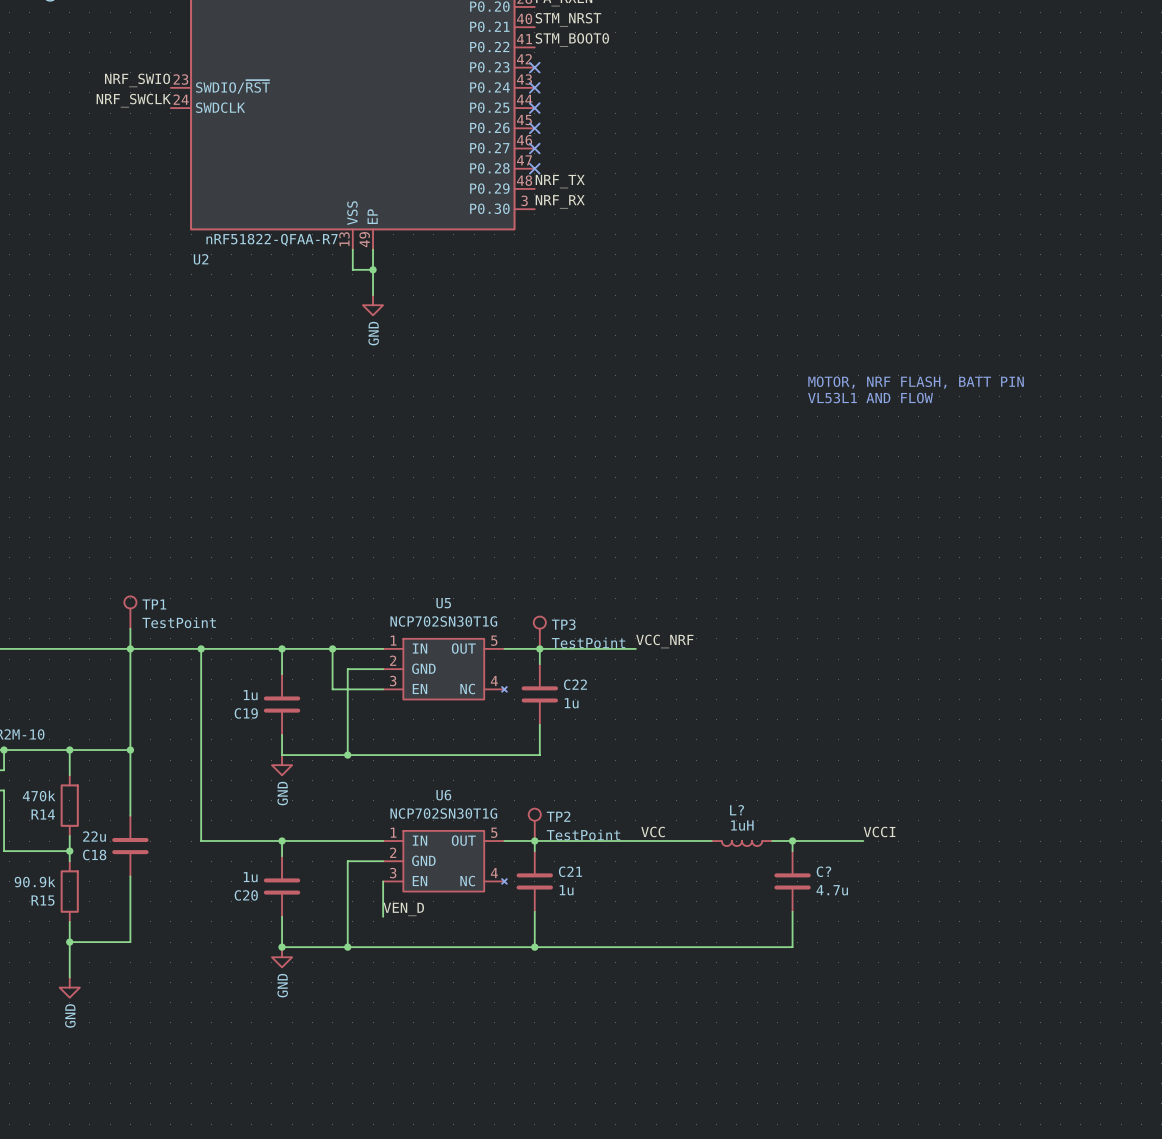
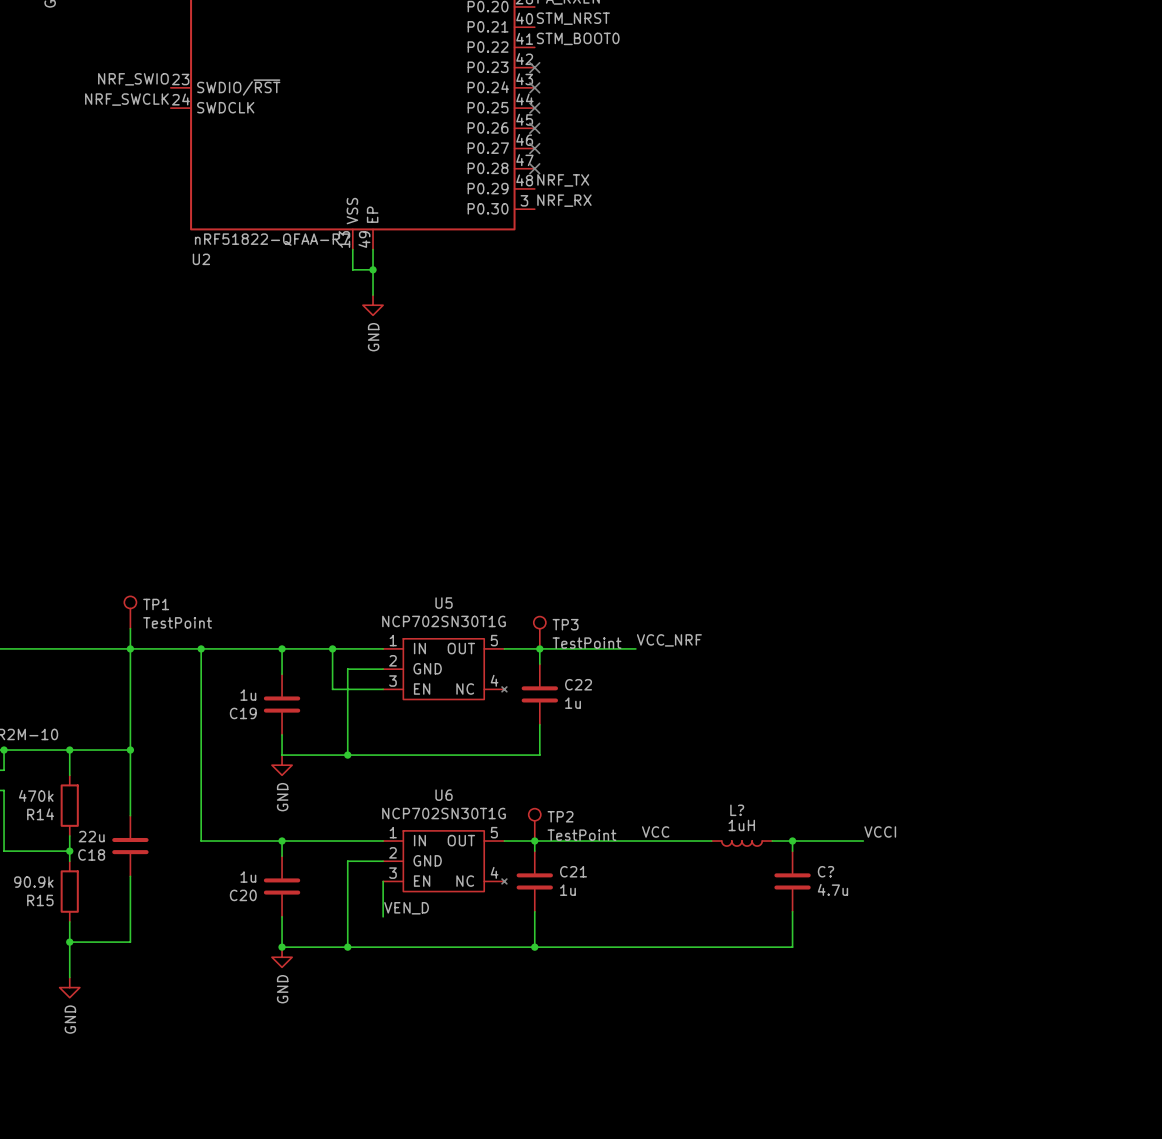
text: MOTOR, NRF FLASH, BATT PIN (916, 382) -> none
text: VL53L1 AND FLOW (870, 398) -> none

